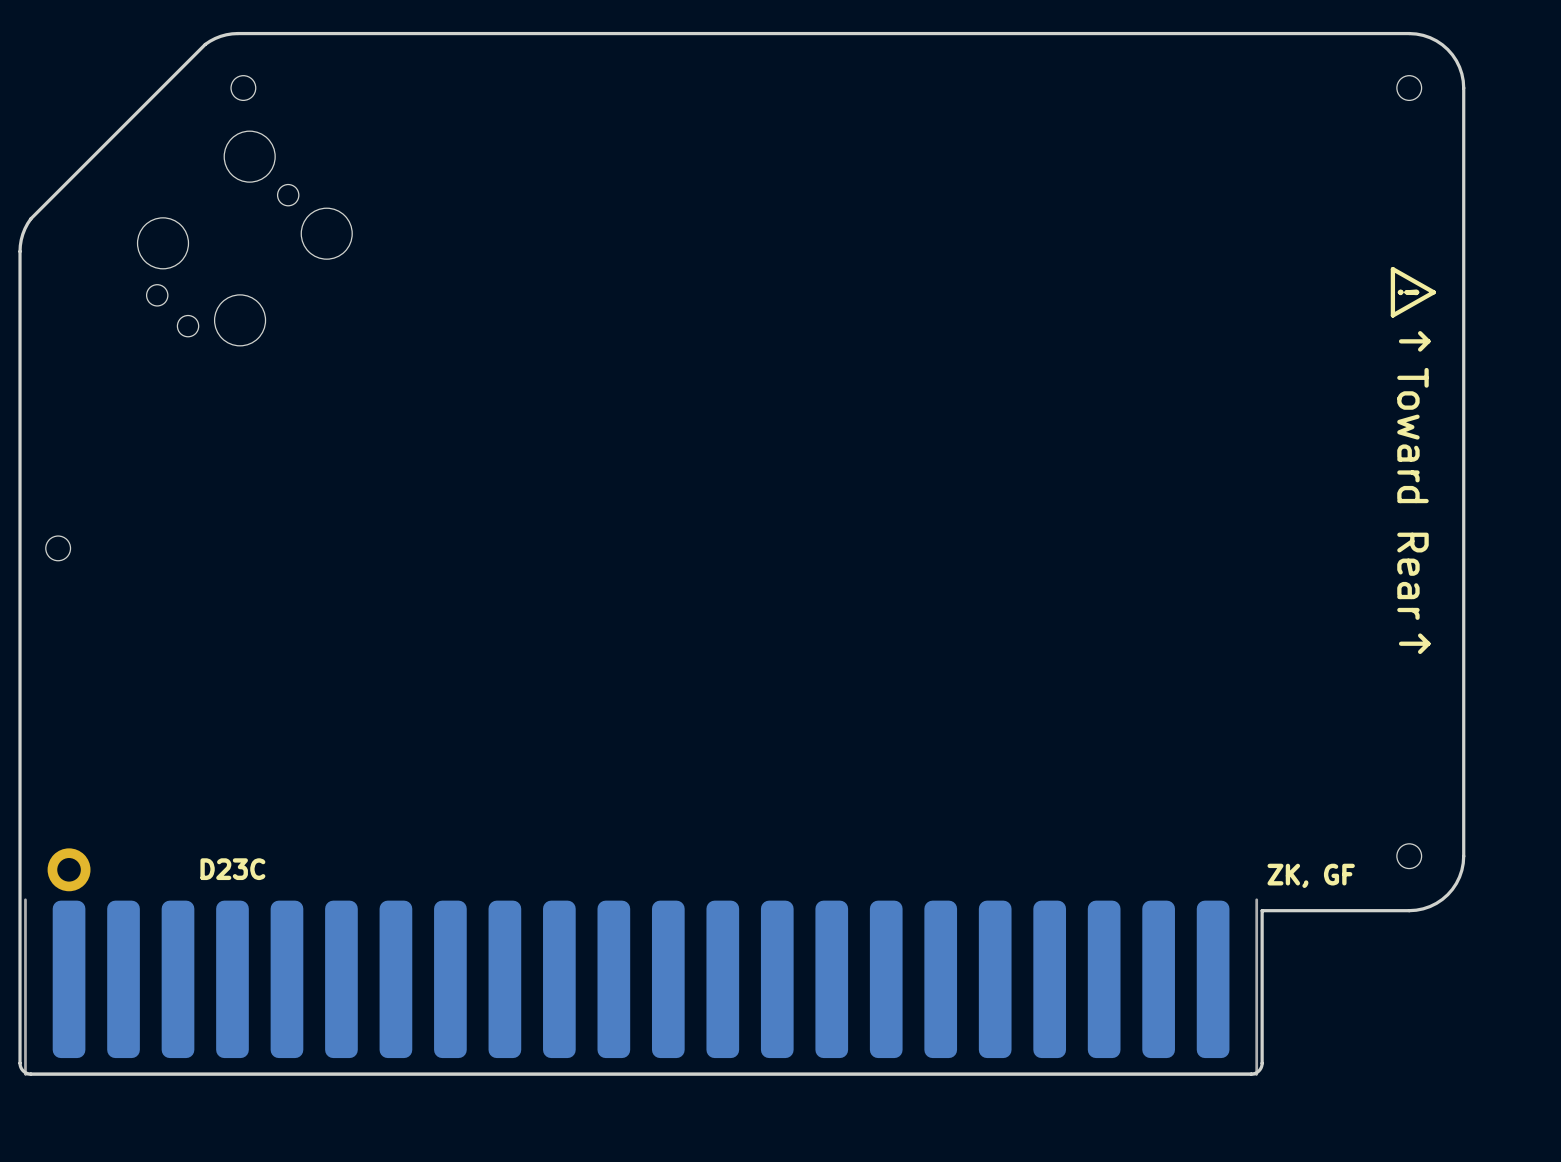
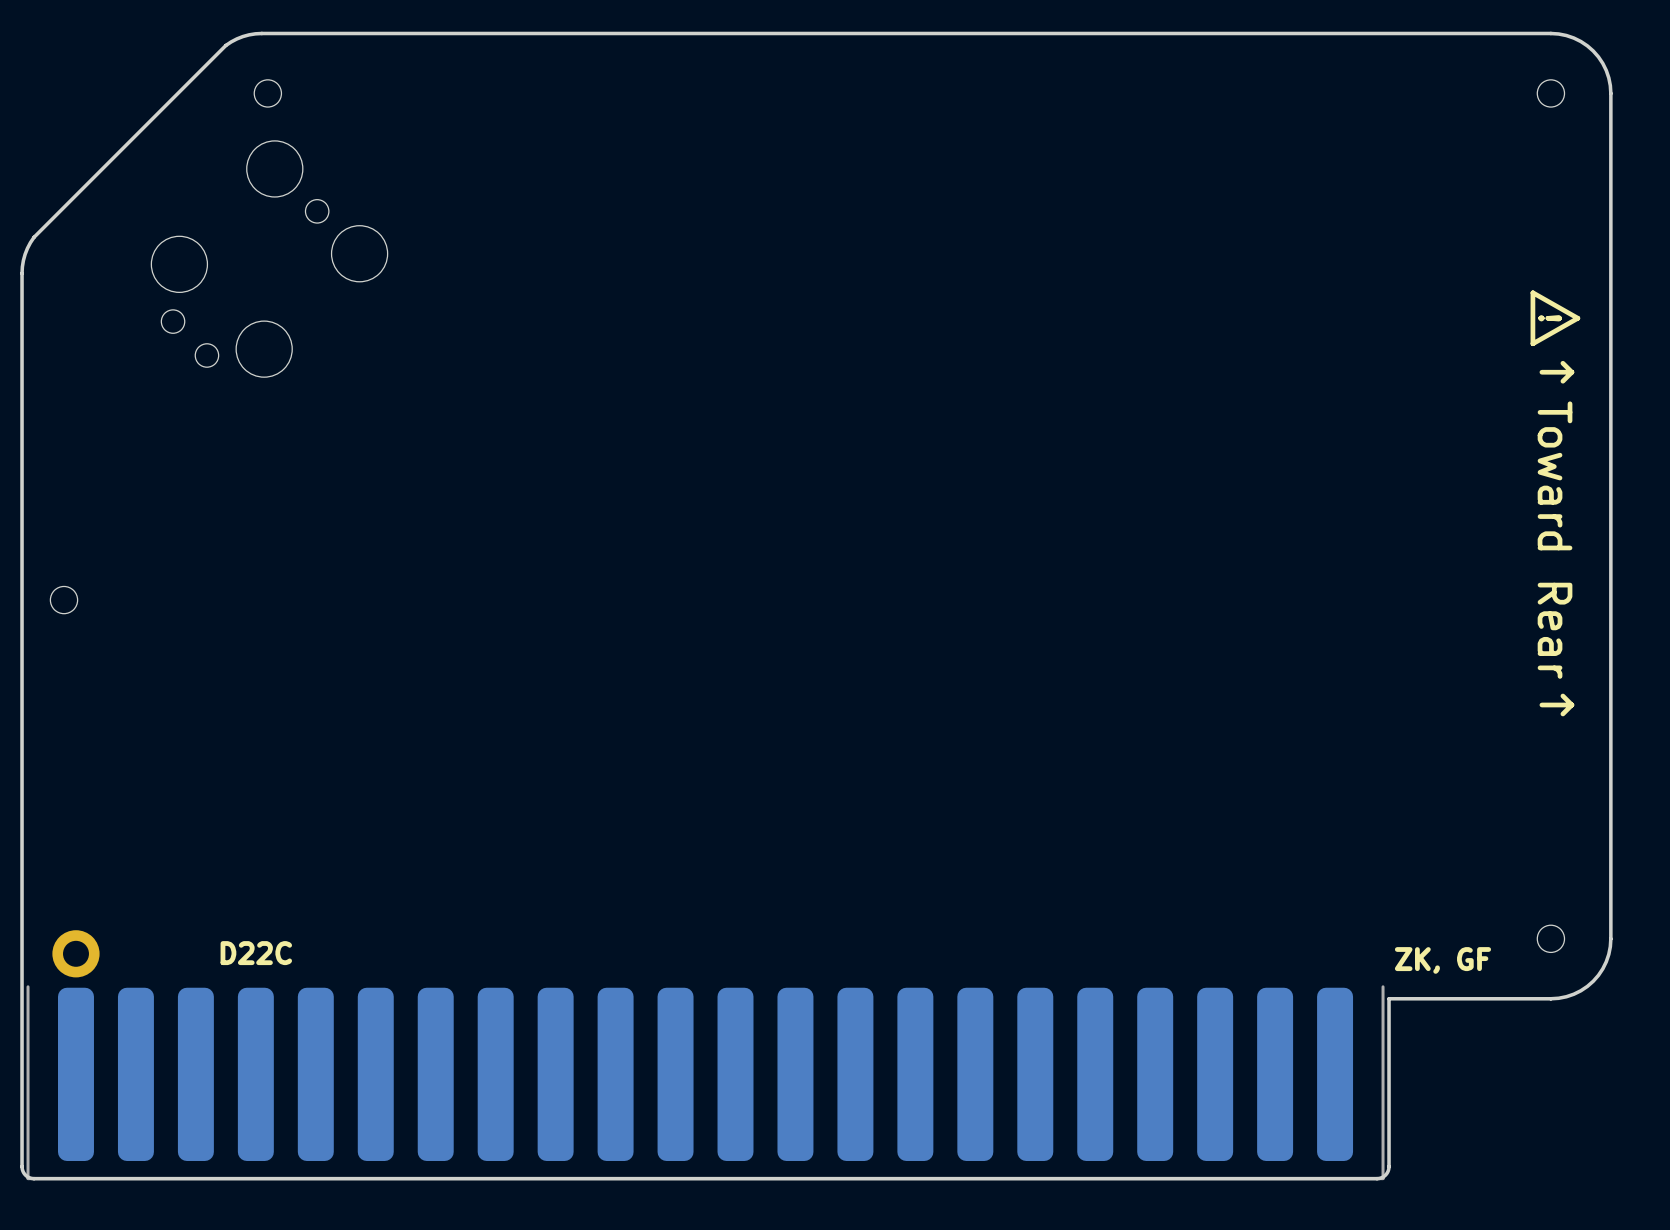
text: D23C (232, 869) -> D22C (256, 953)

